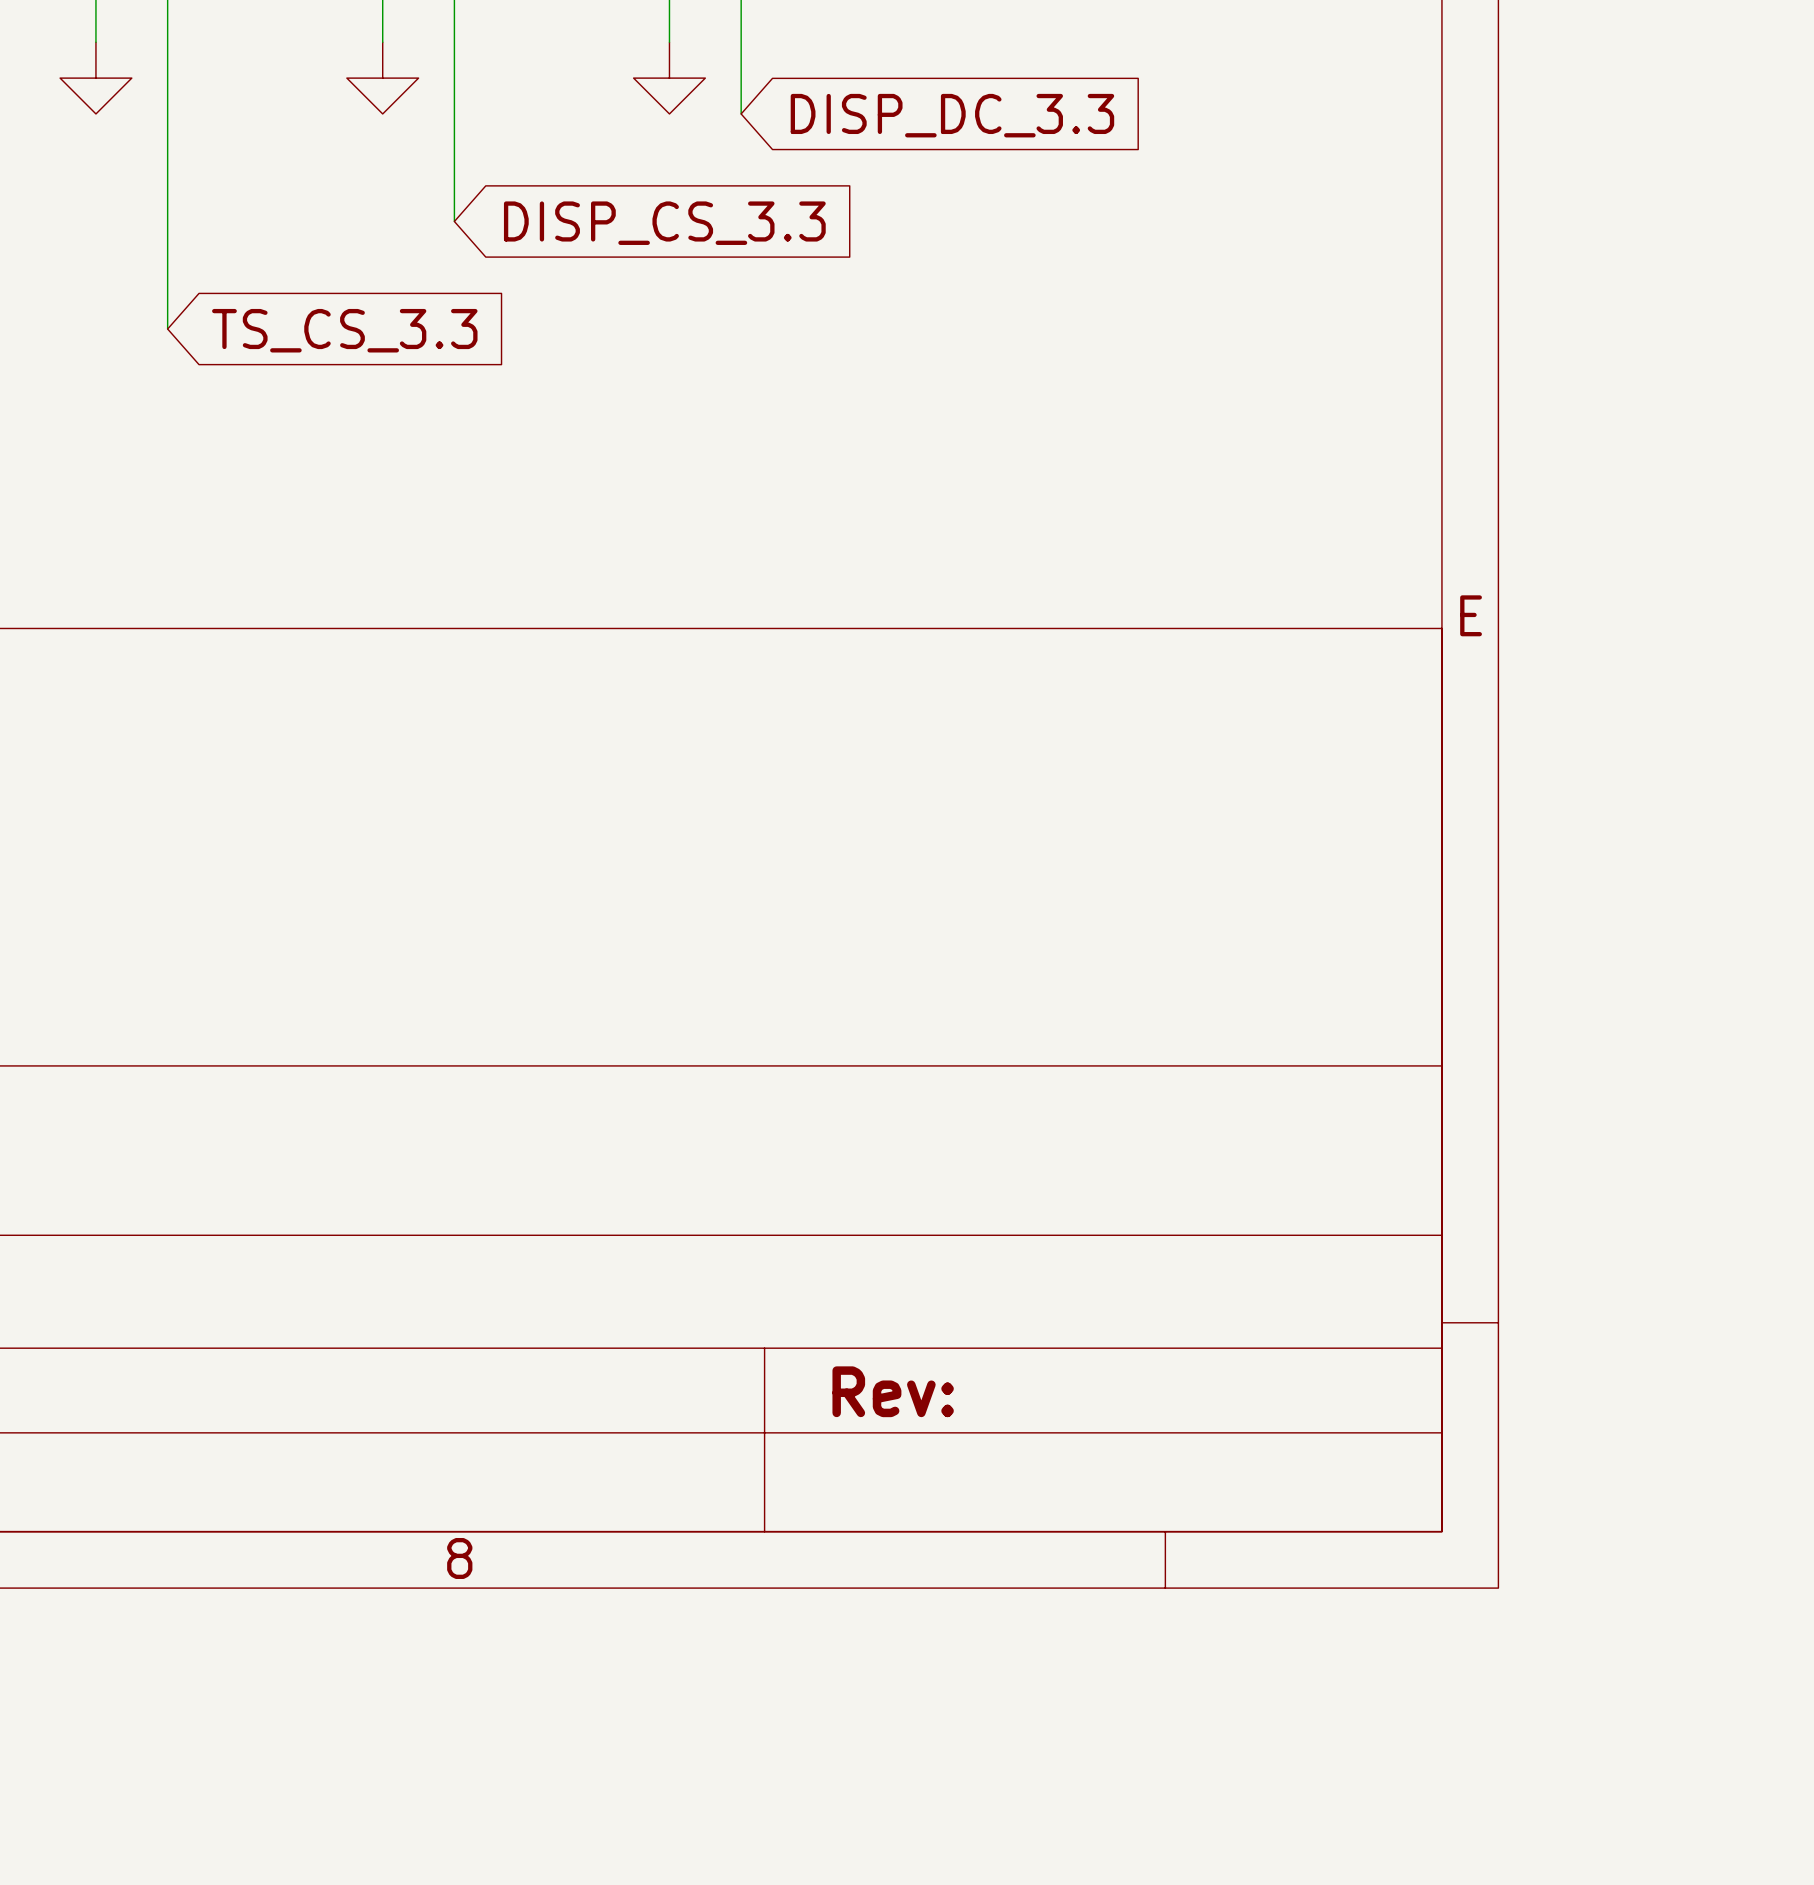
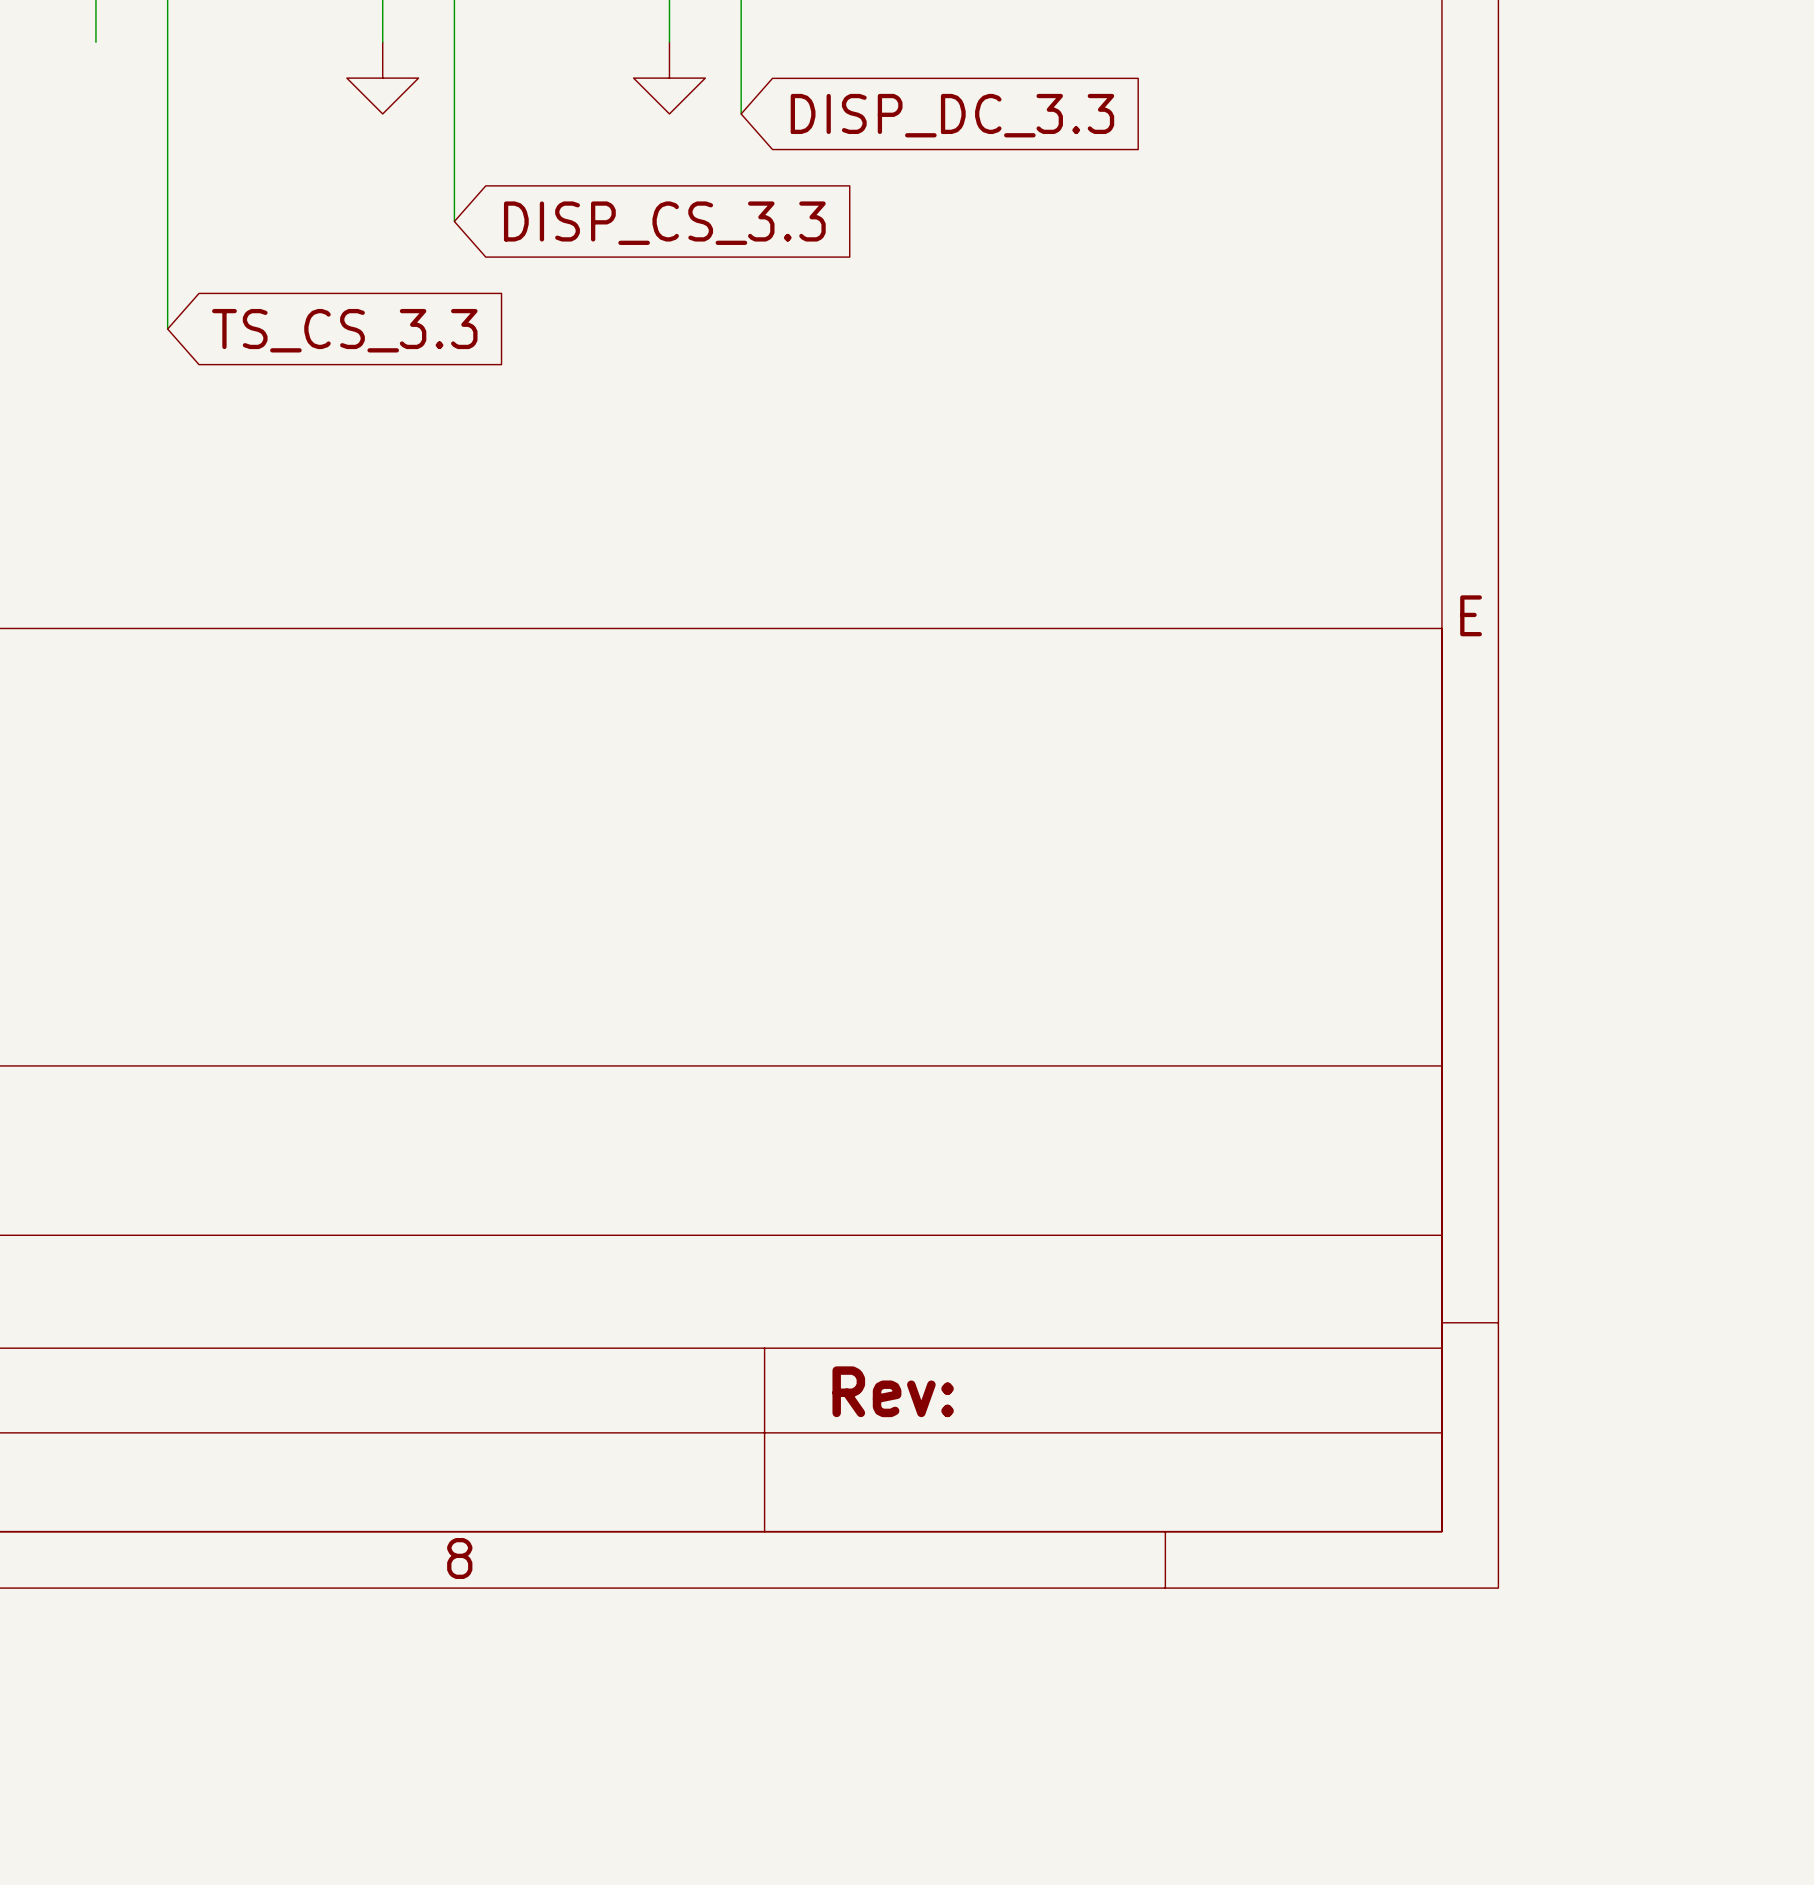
power symbol: (95, 78) -> none

